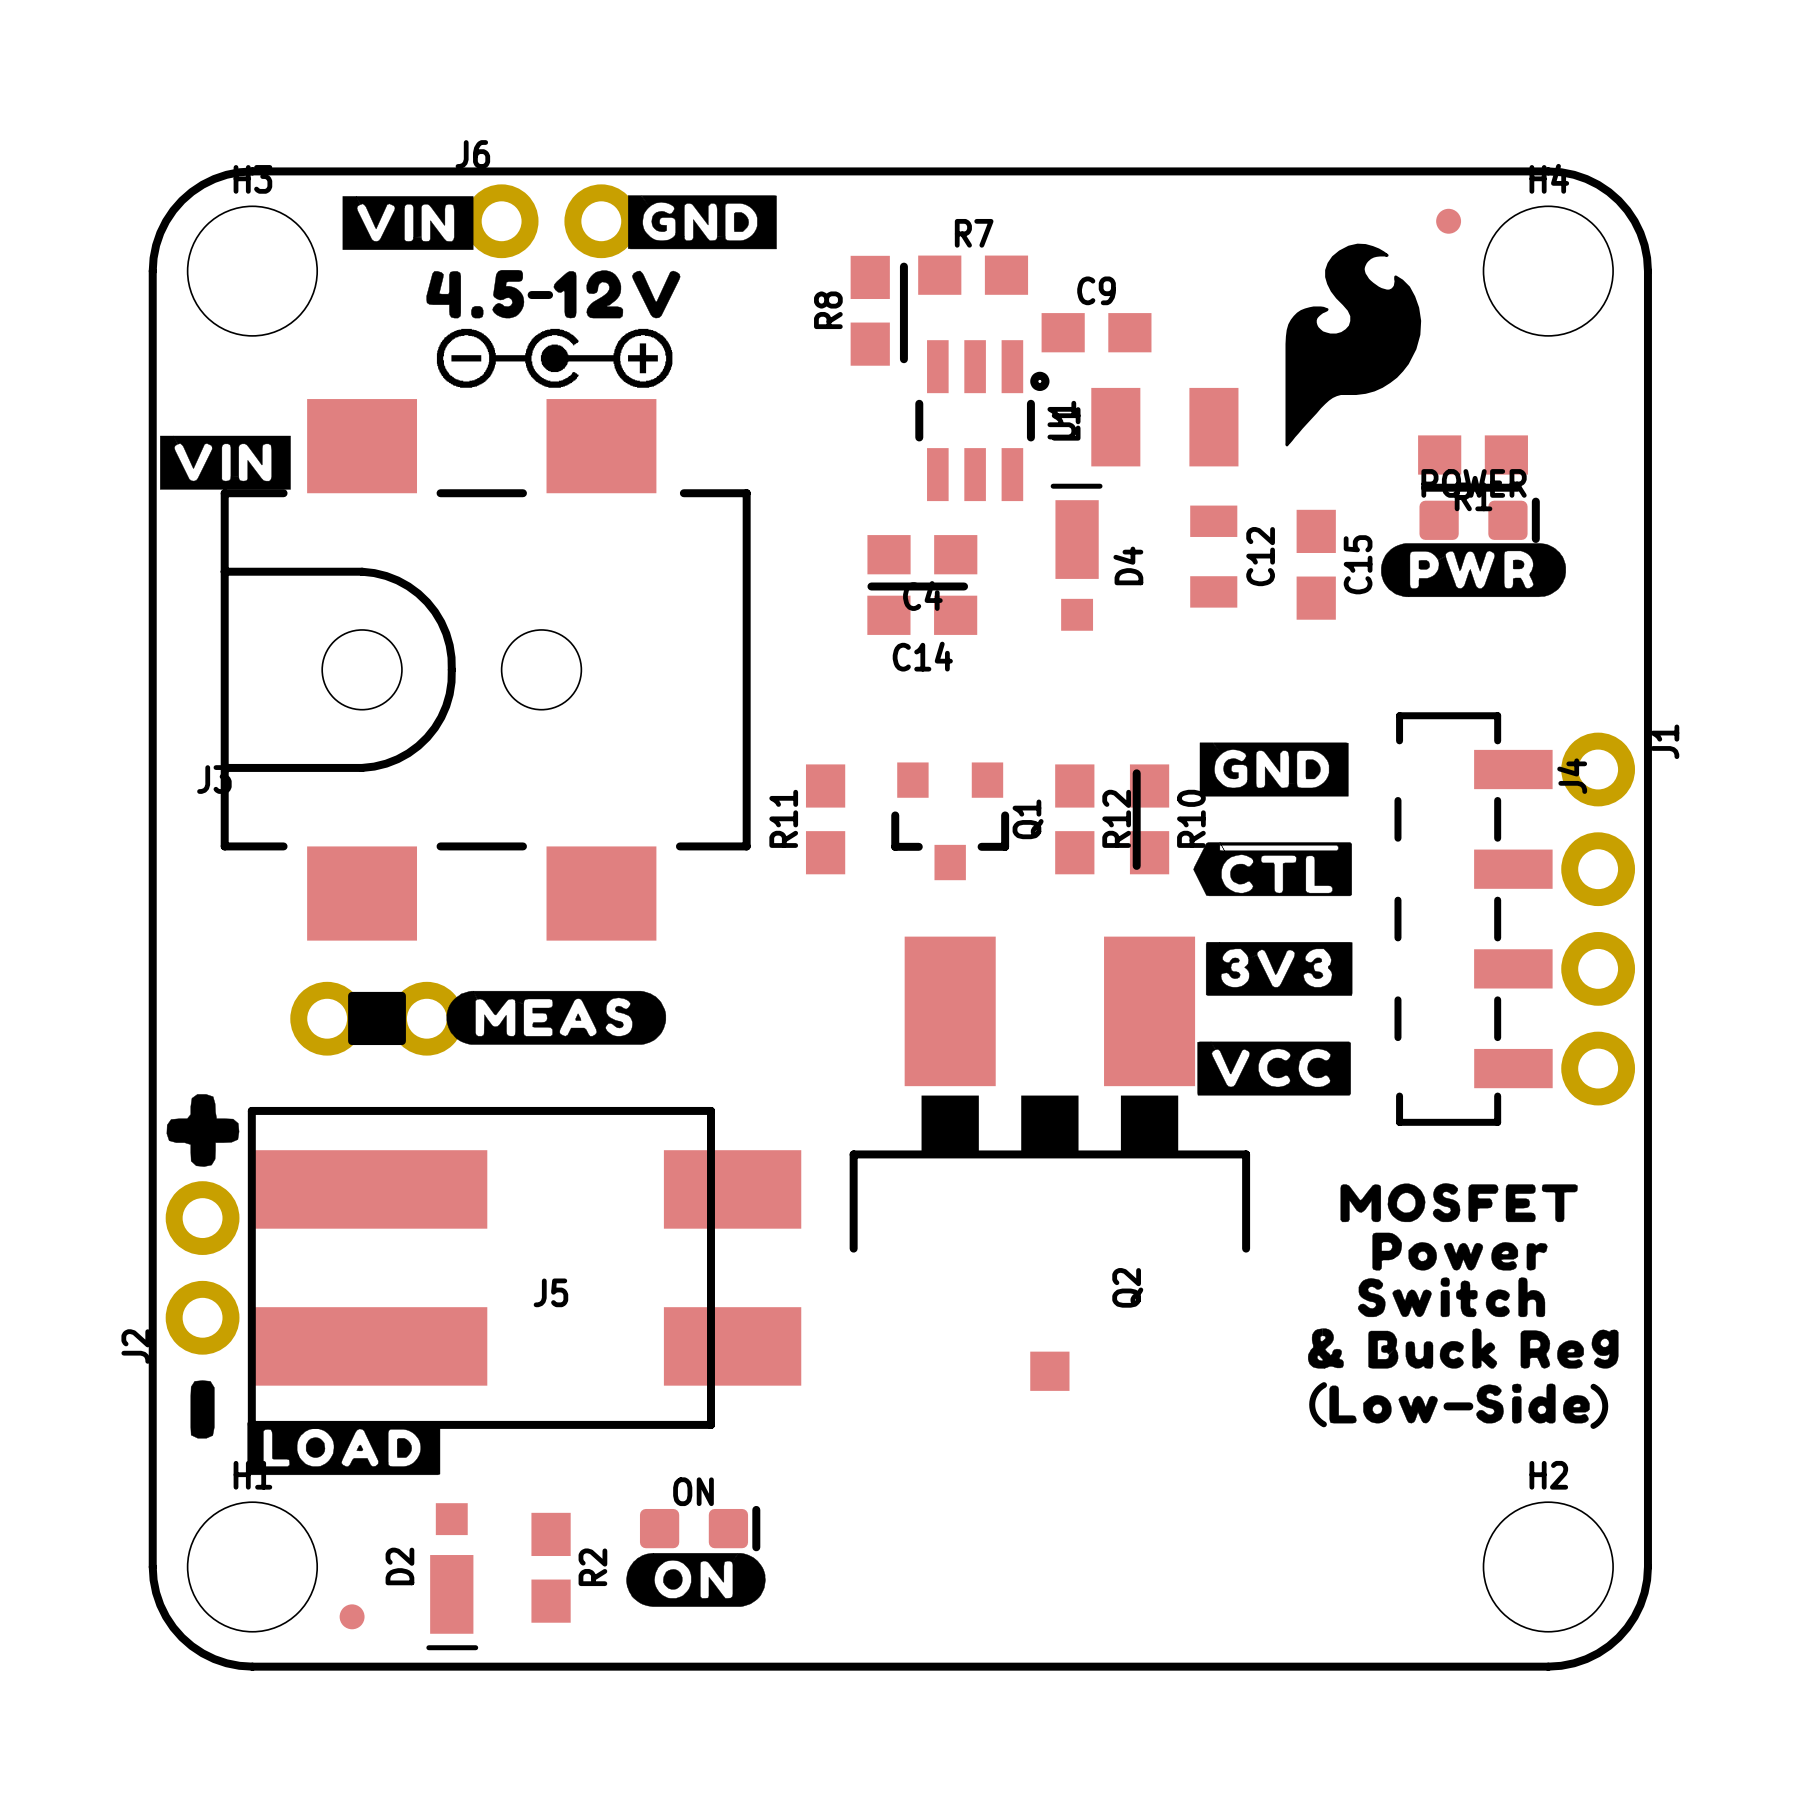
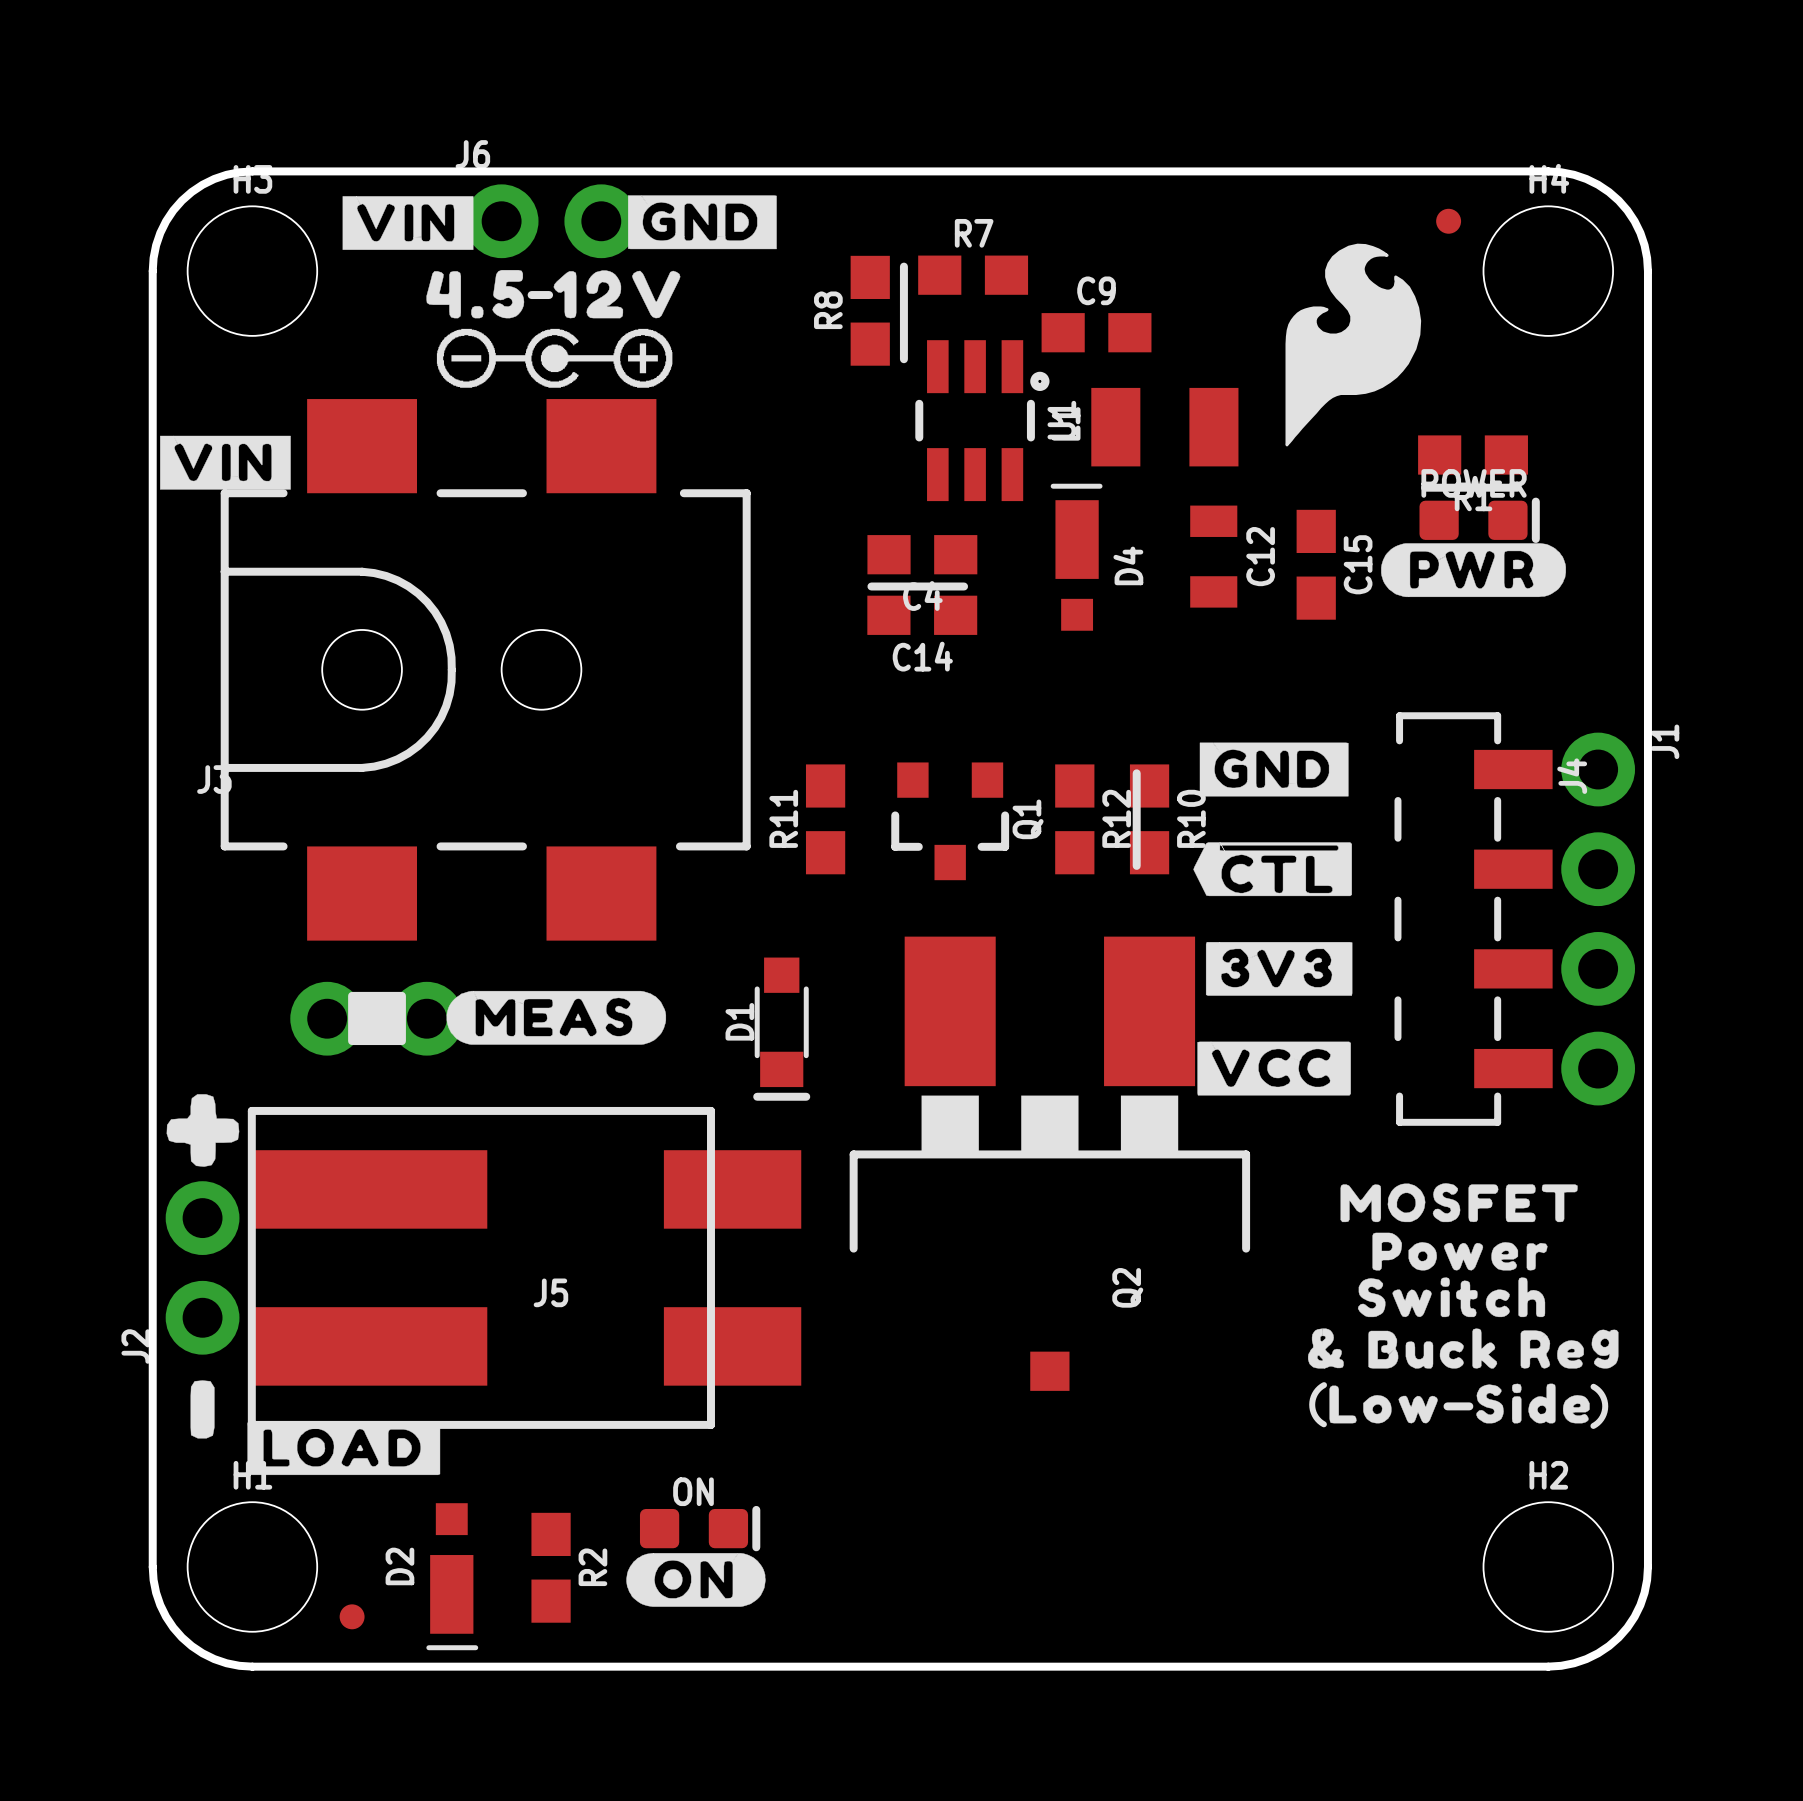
D1: none -> (781, 1029)

